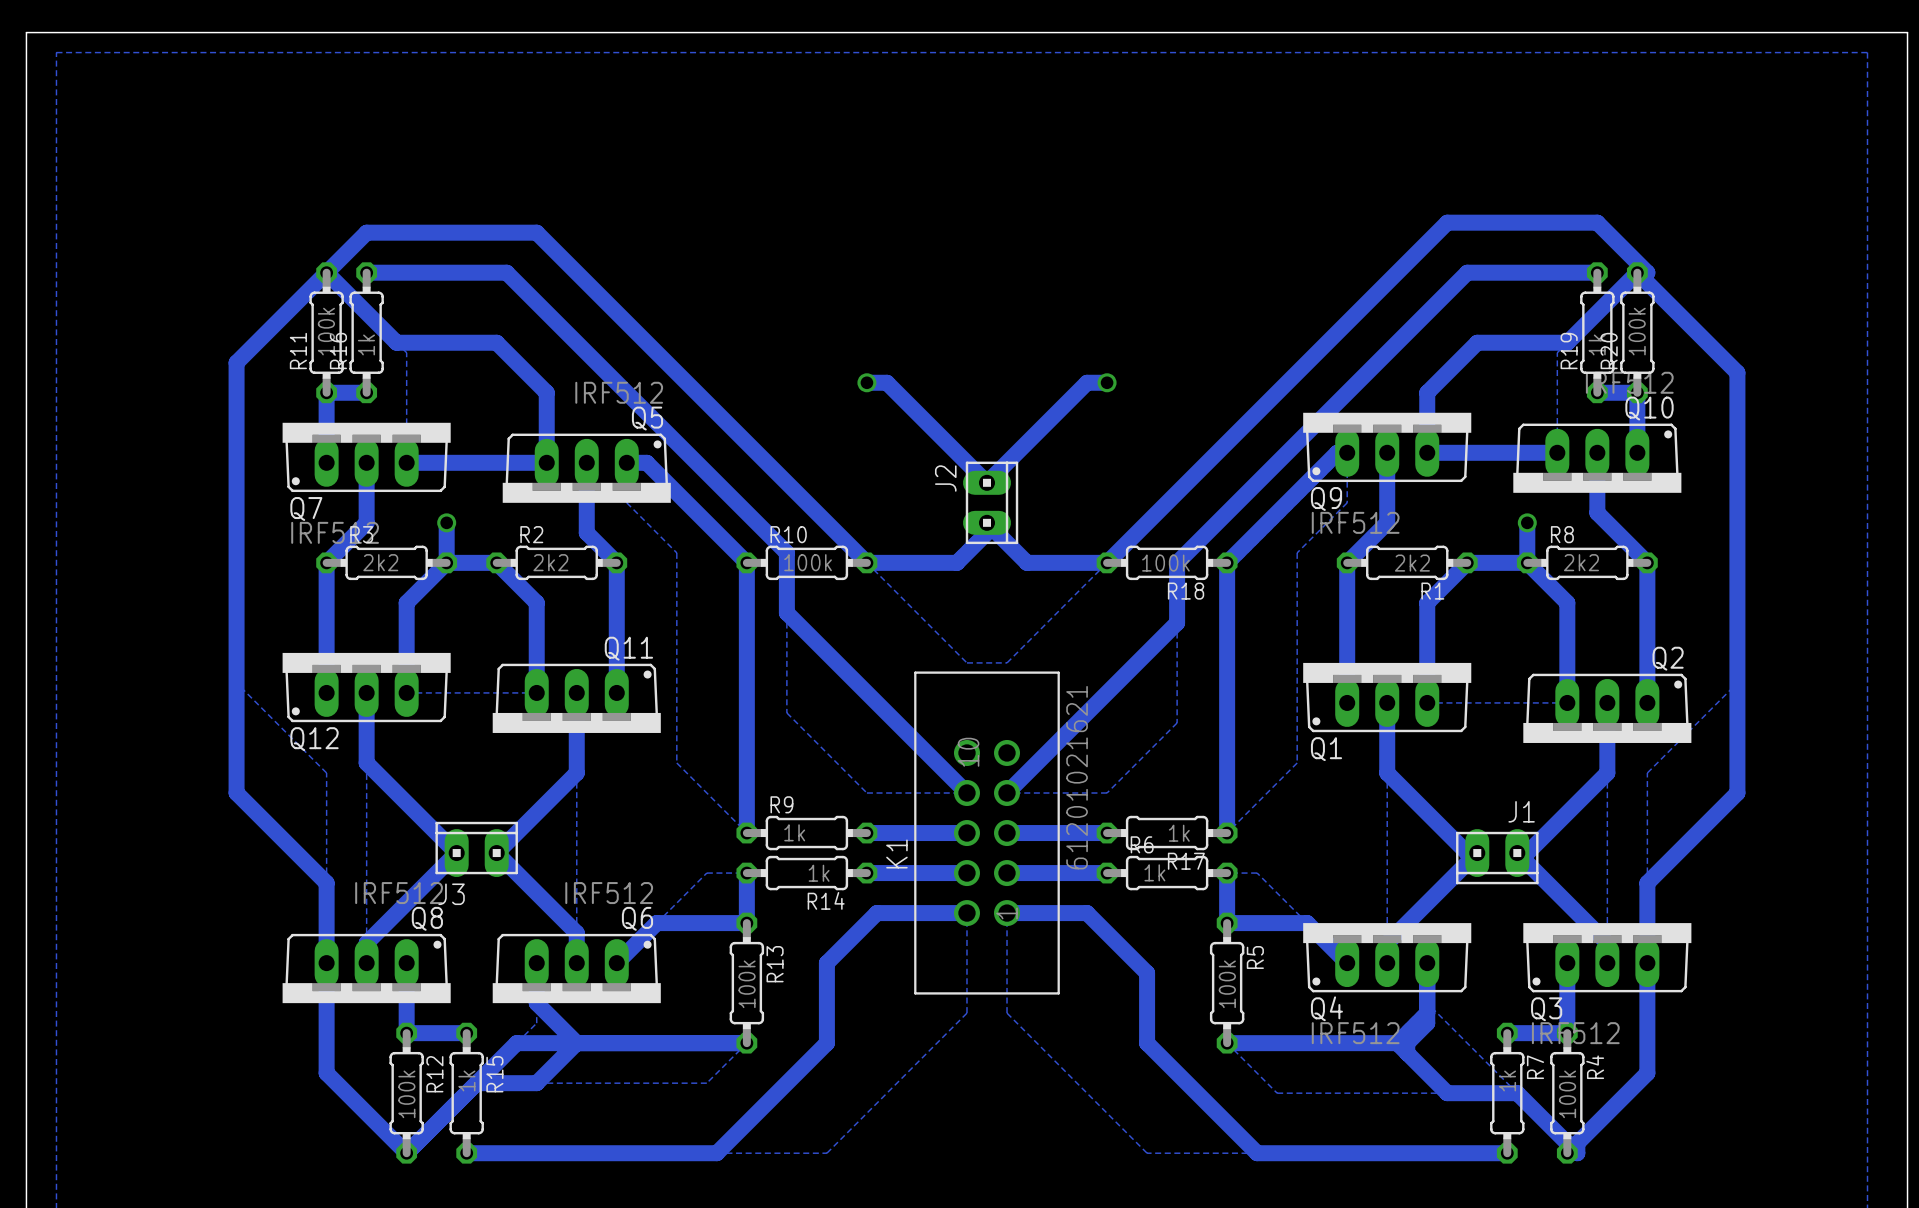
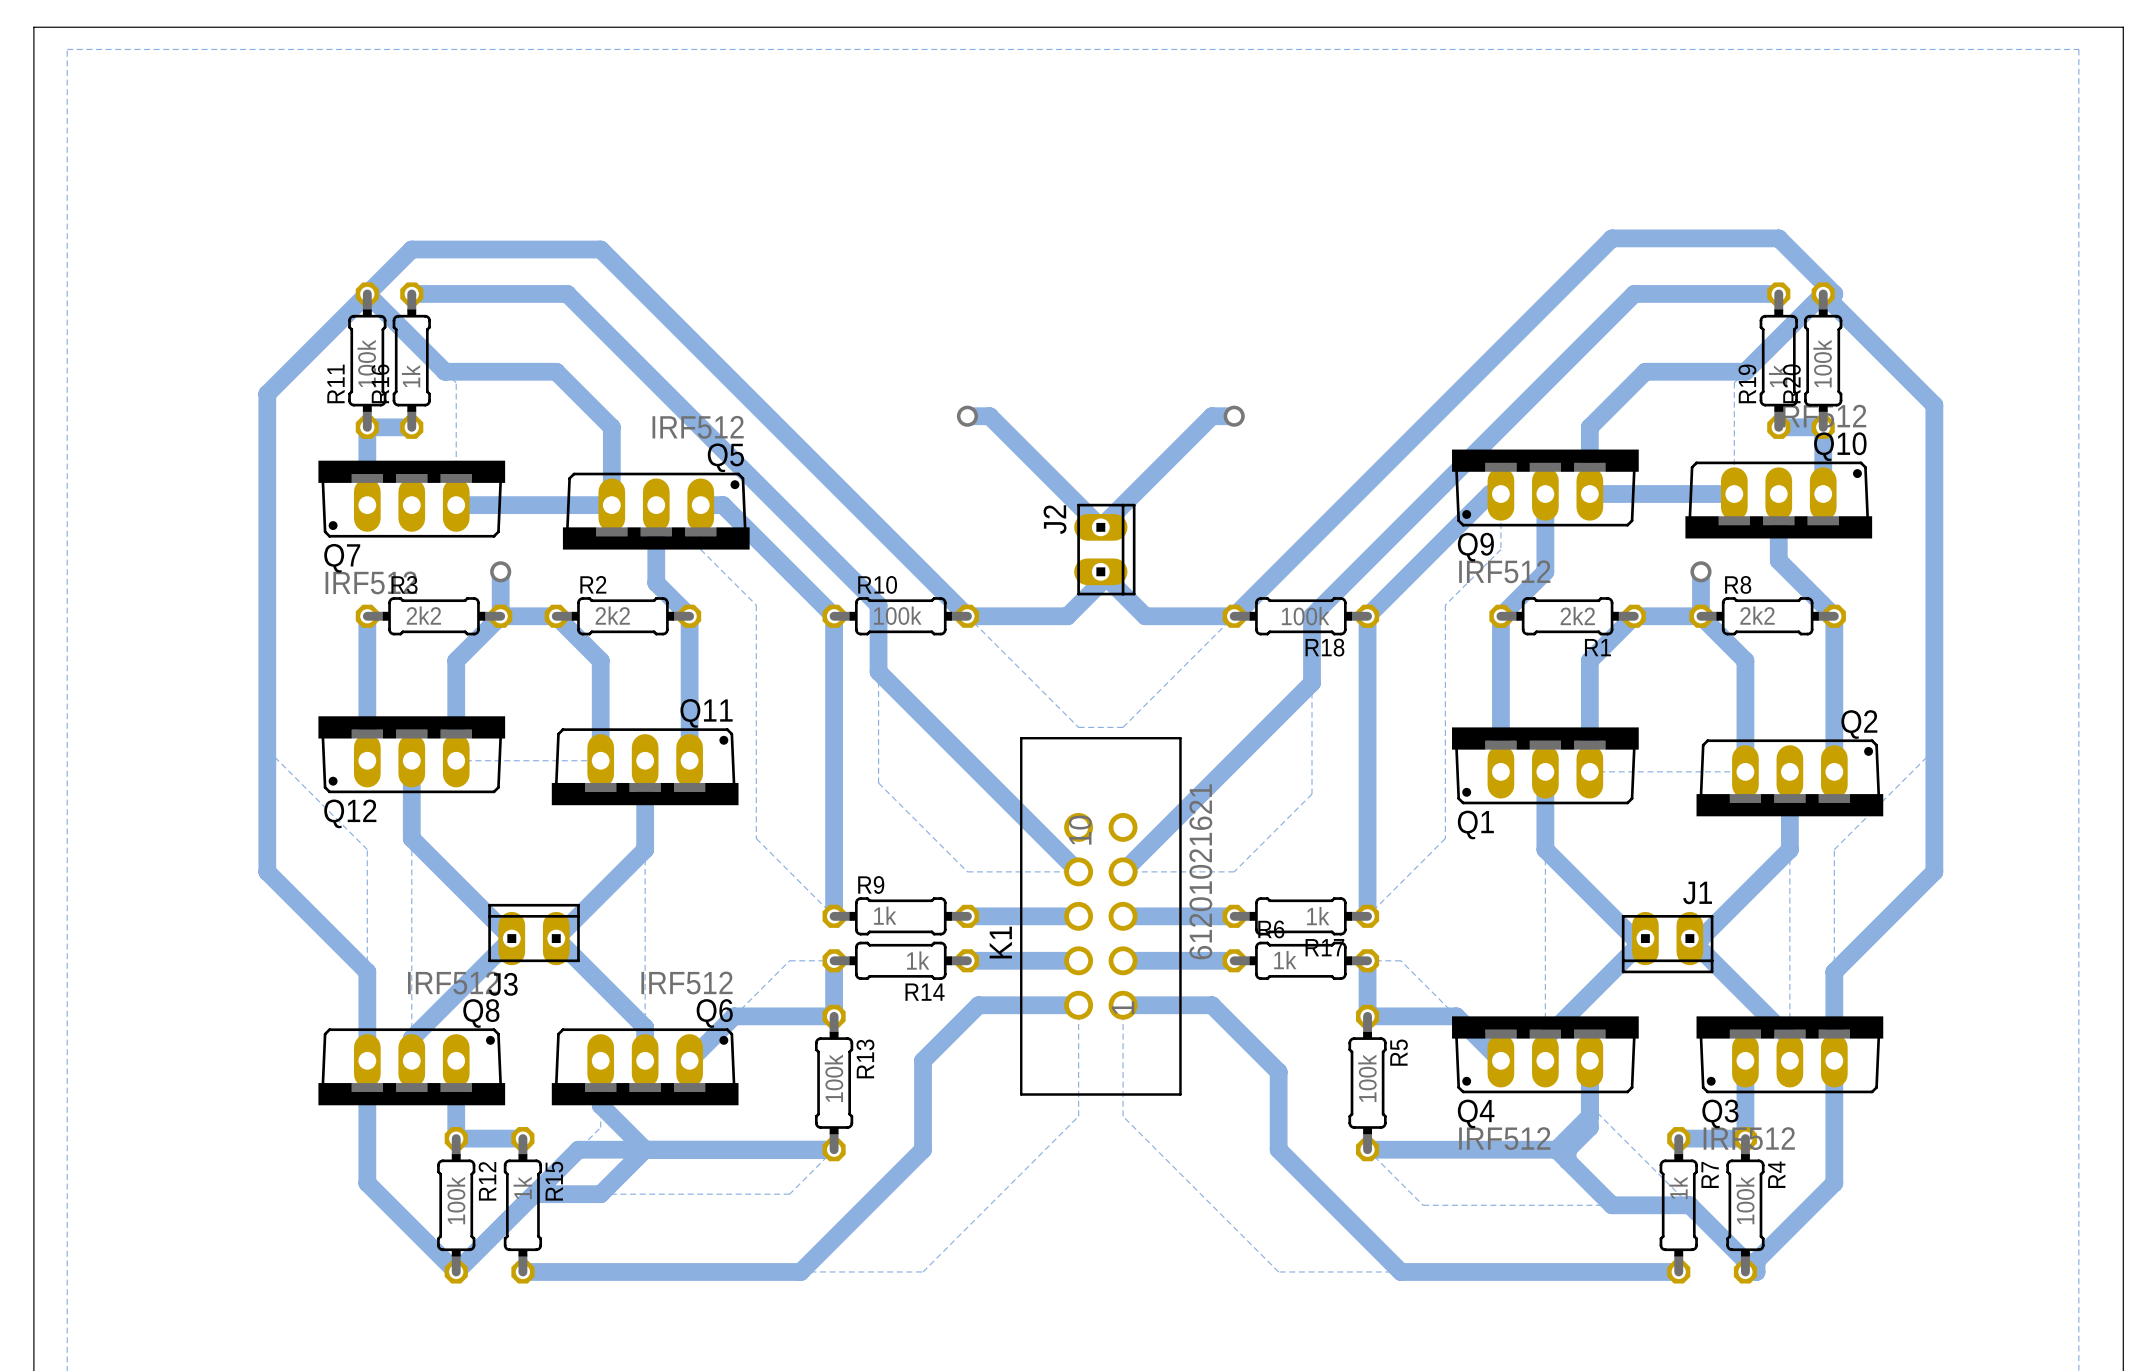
bottom track: (366, 462) (366, 522) (326, 562) -> none

